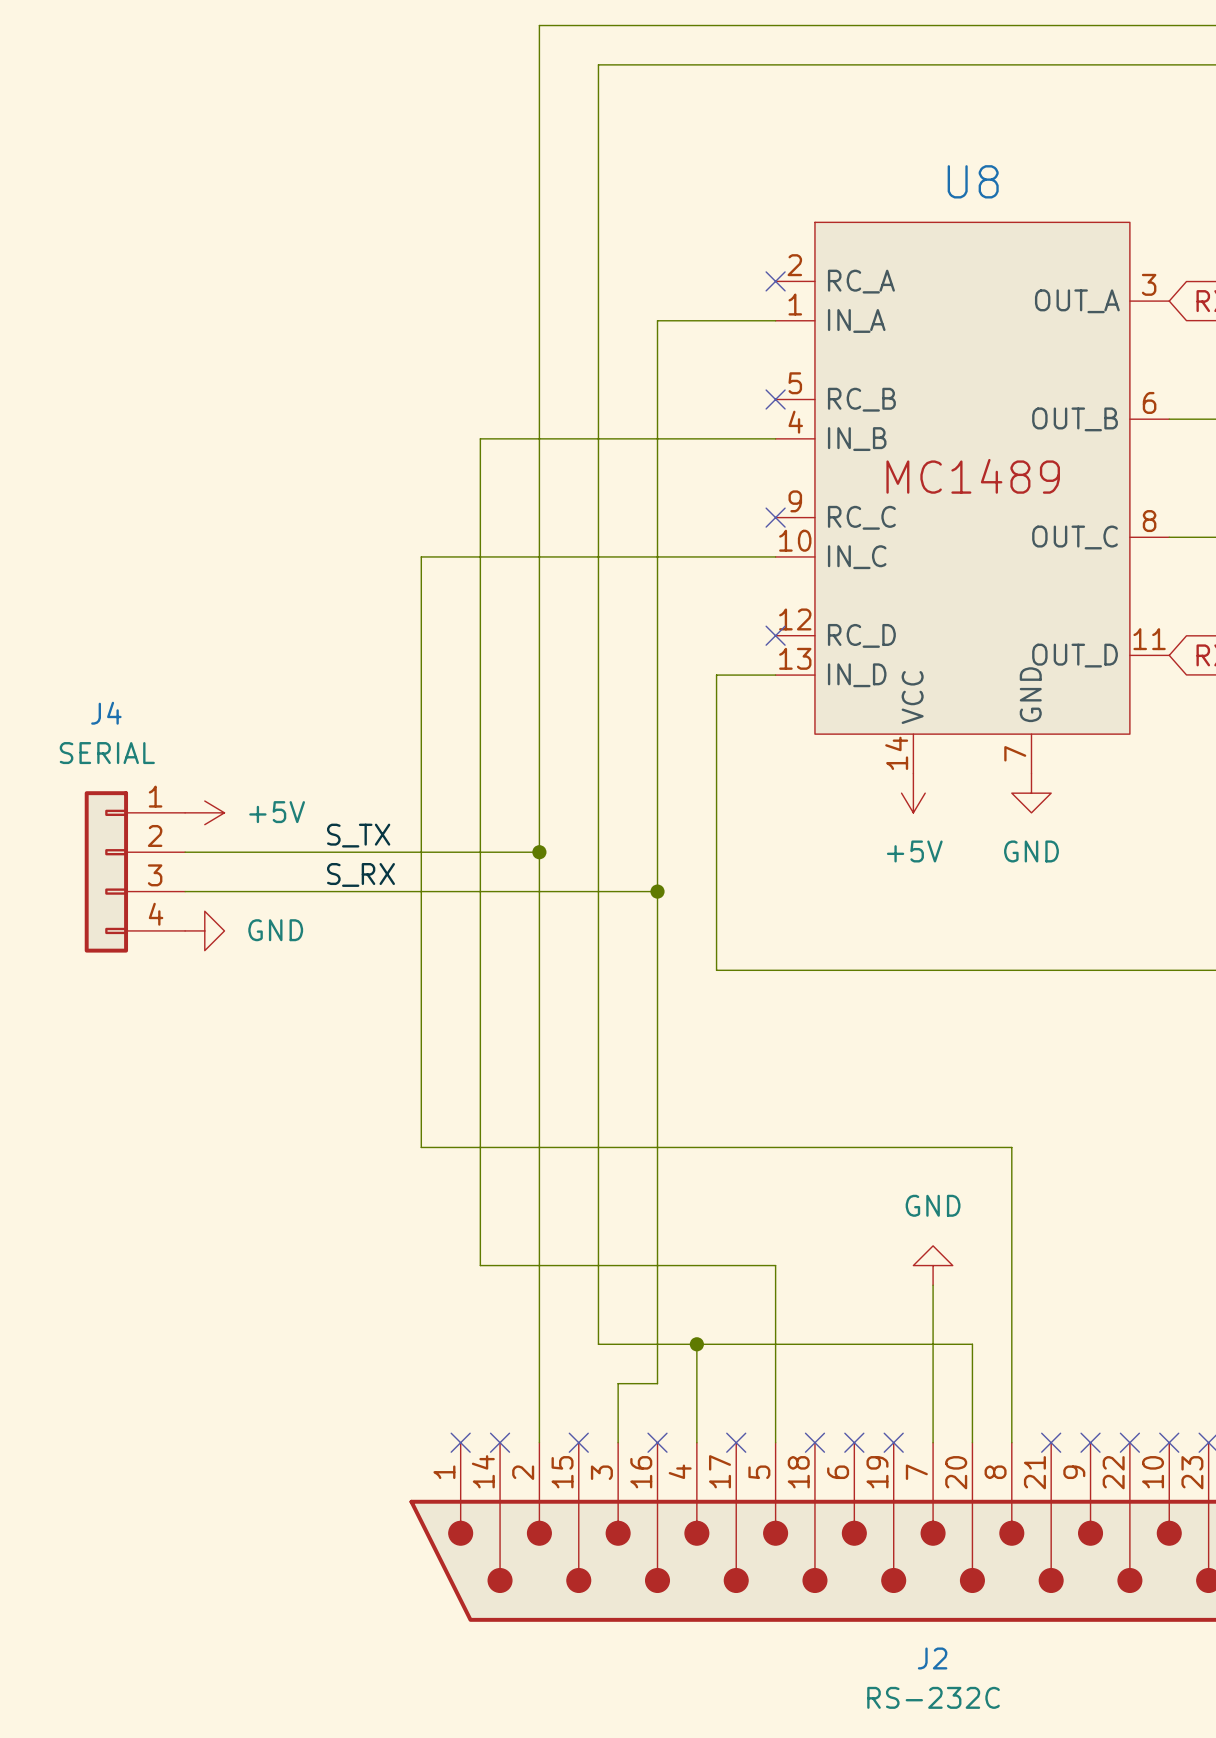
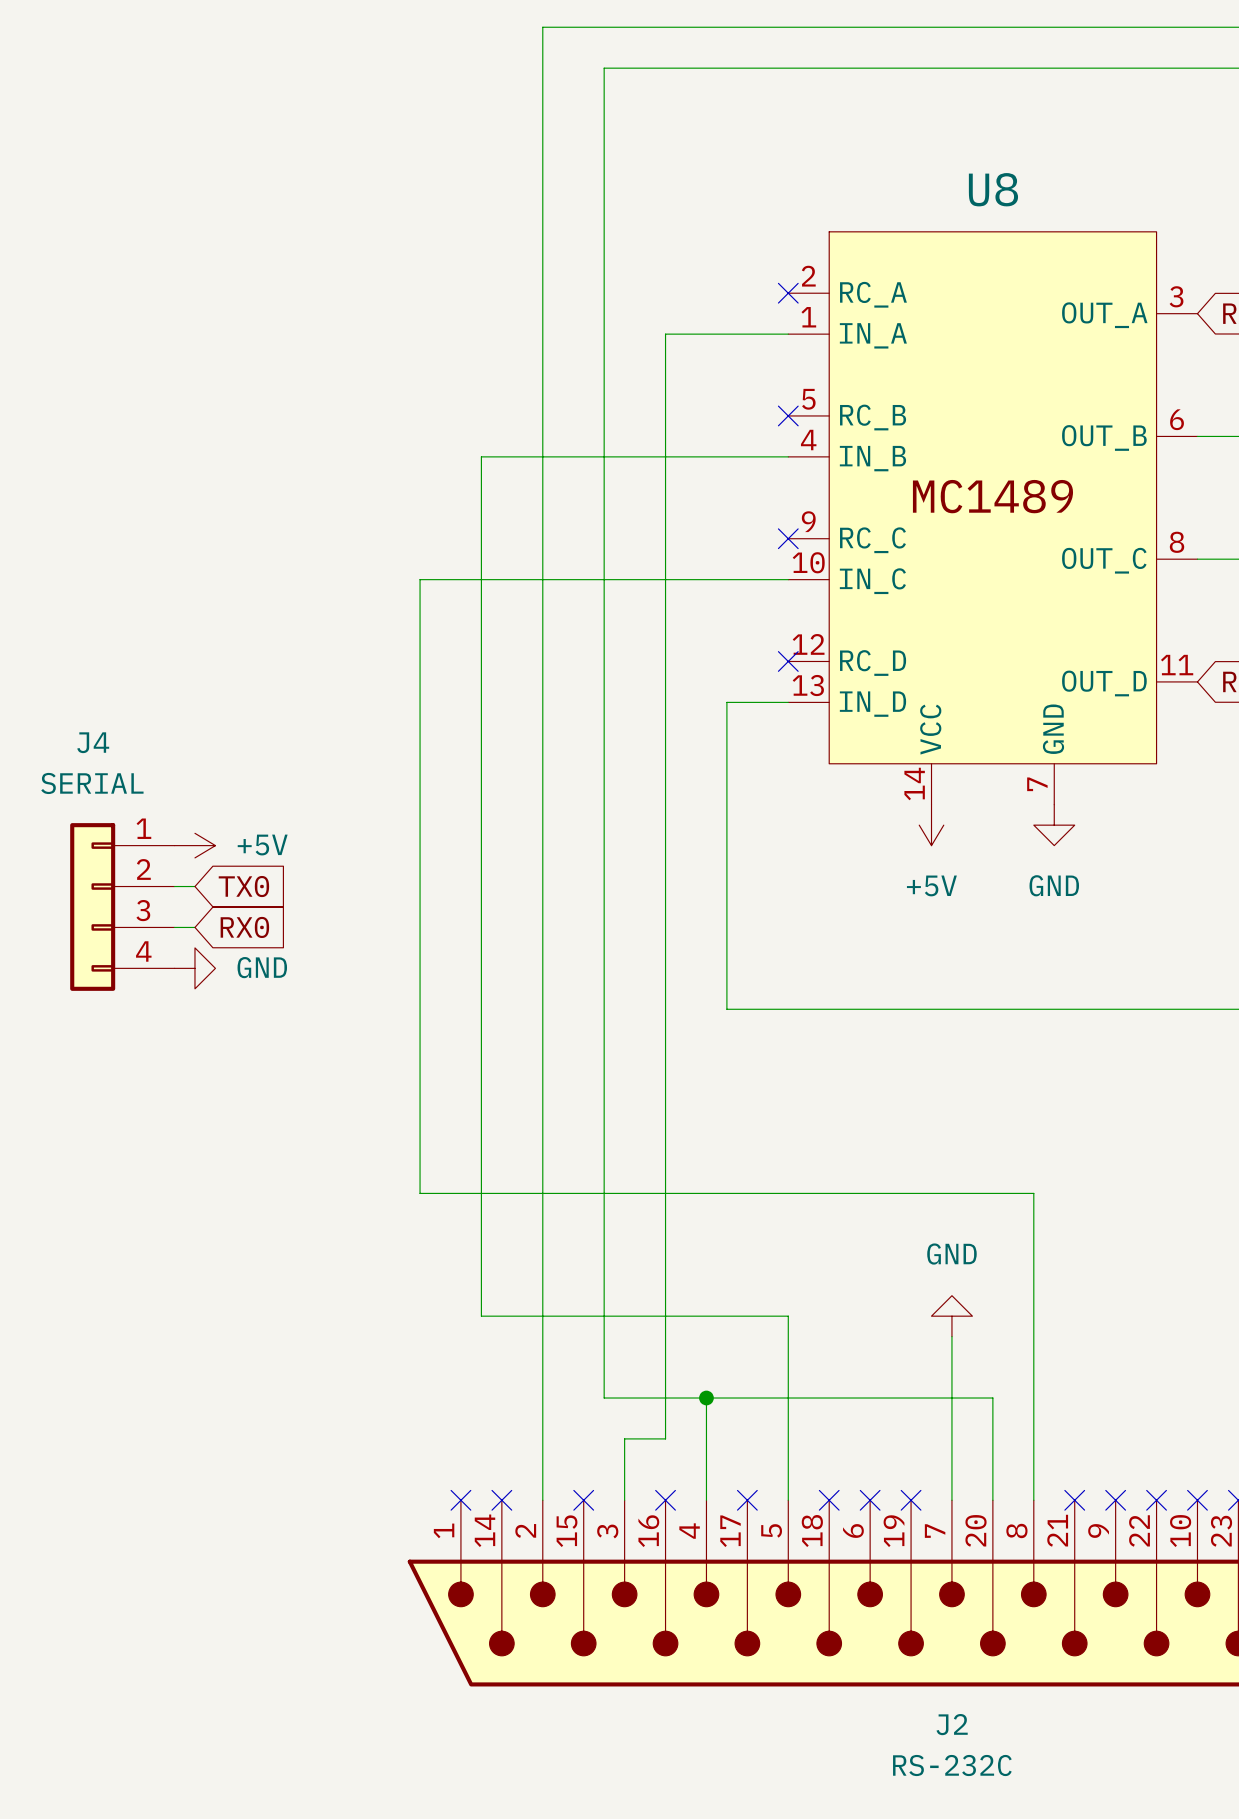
label: S_TX (358, 835) -> none
wire: (204, 852) (539, 852) -> none
global label: none -> TX0 (243, 886)
junction: (539, 852) -> none
label: S_RX (361, 874) -> none
wire: (204, 891) (657, 891) -> none
global label: none -> RX0 (244, 927)
junction: (657, 891) -> none

